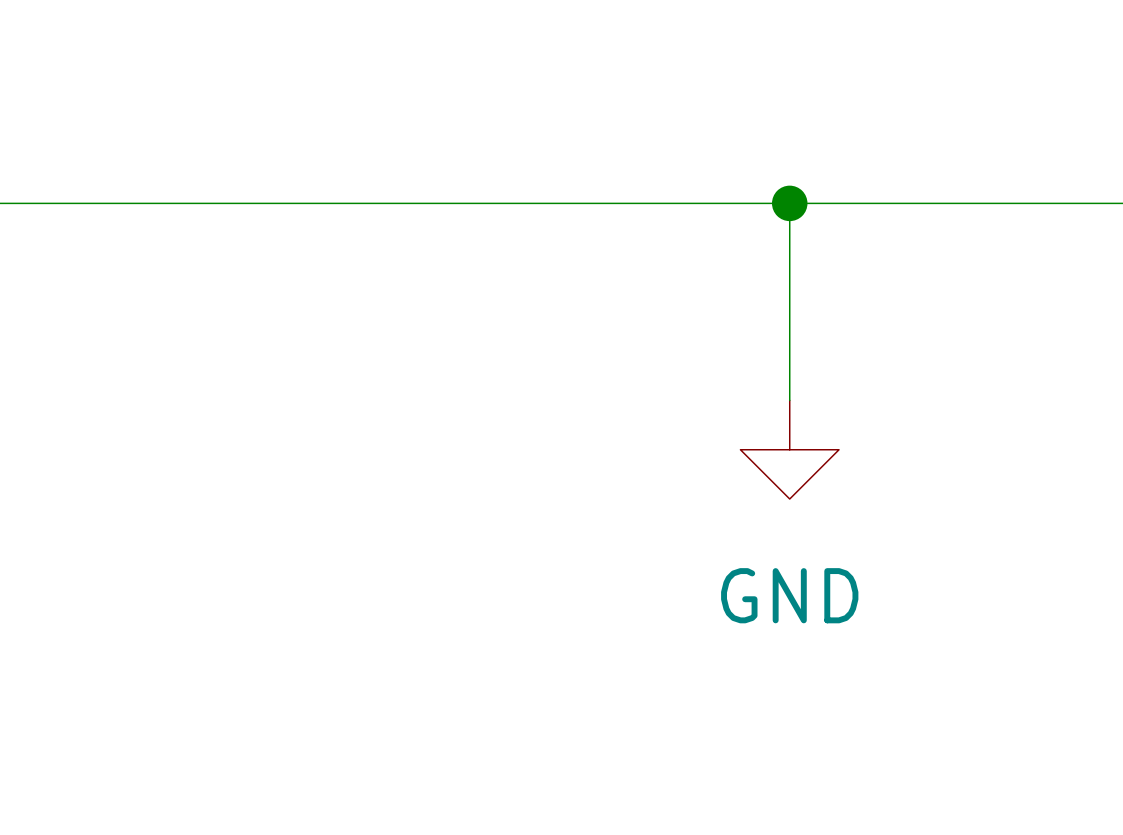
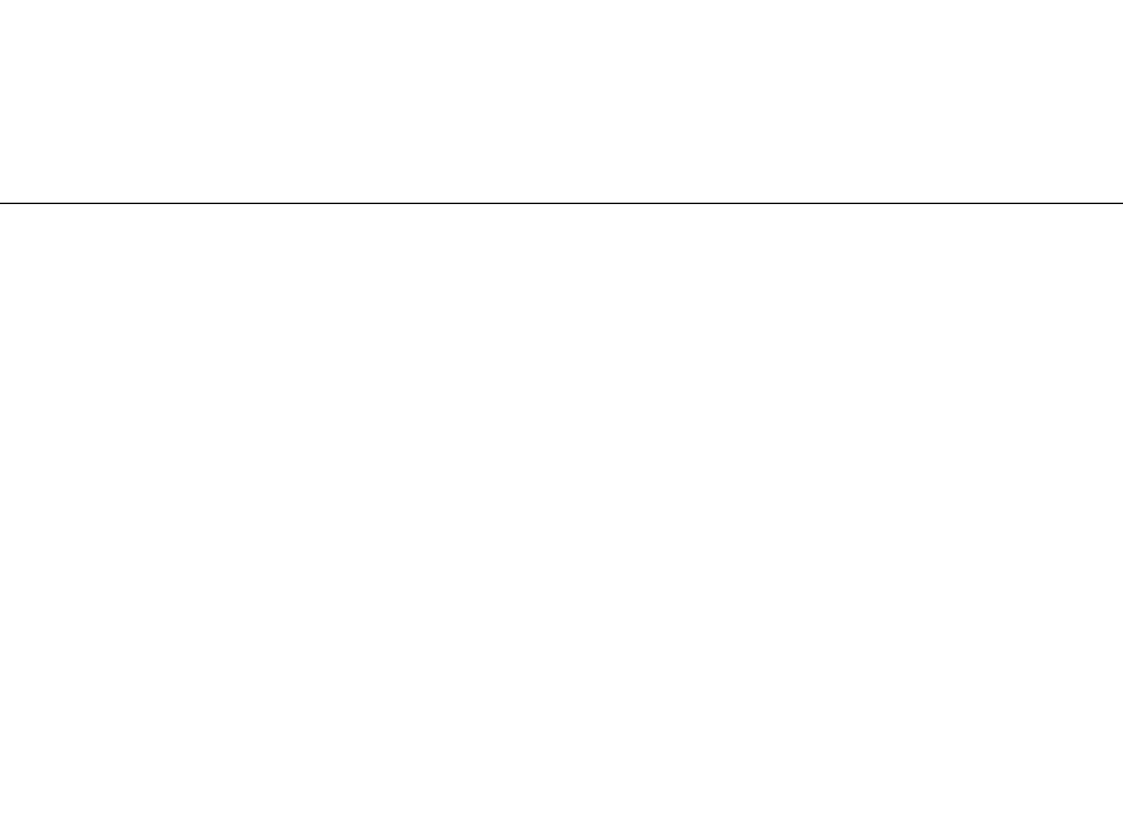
wire: (789, 203) (789, 400) -> none
junction: (789, 203) -> none
power symbol: GND (789, 449) -> none

